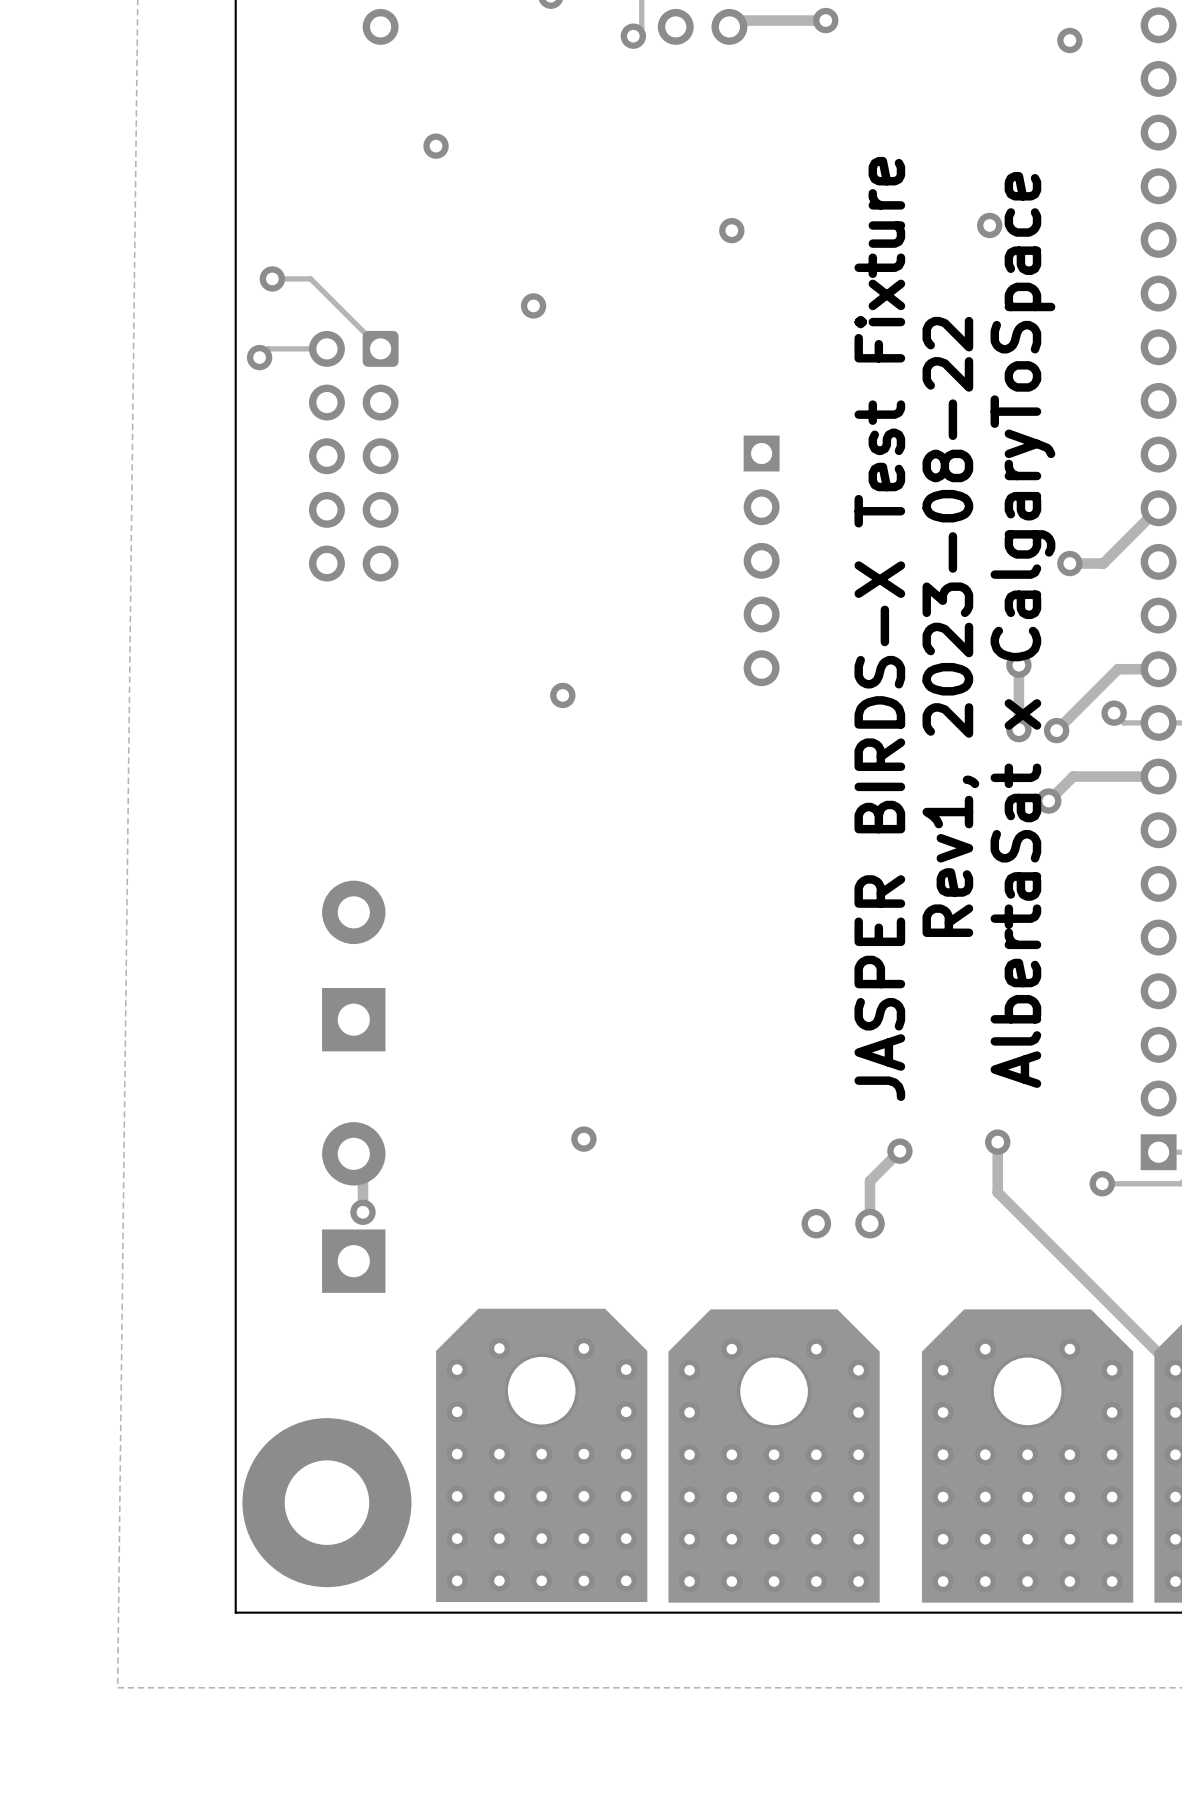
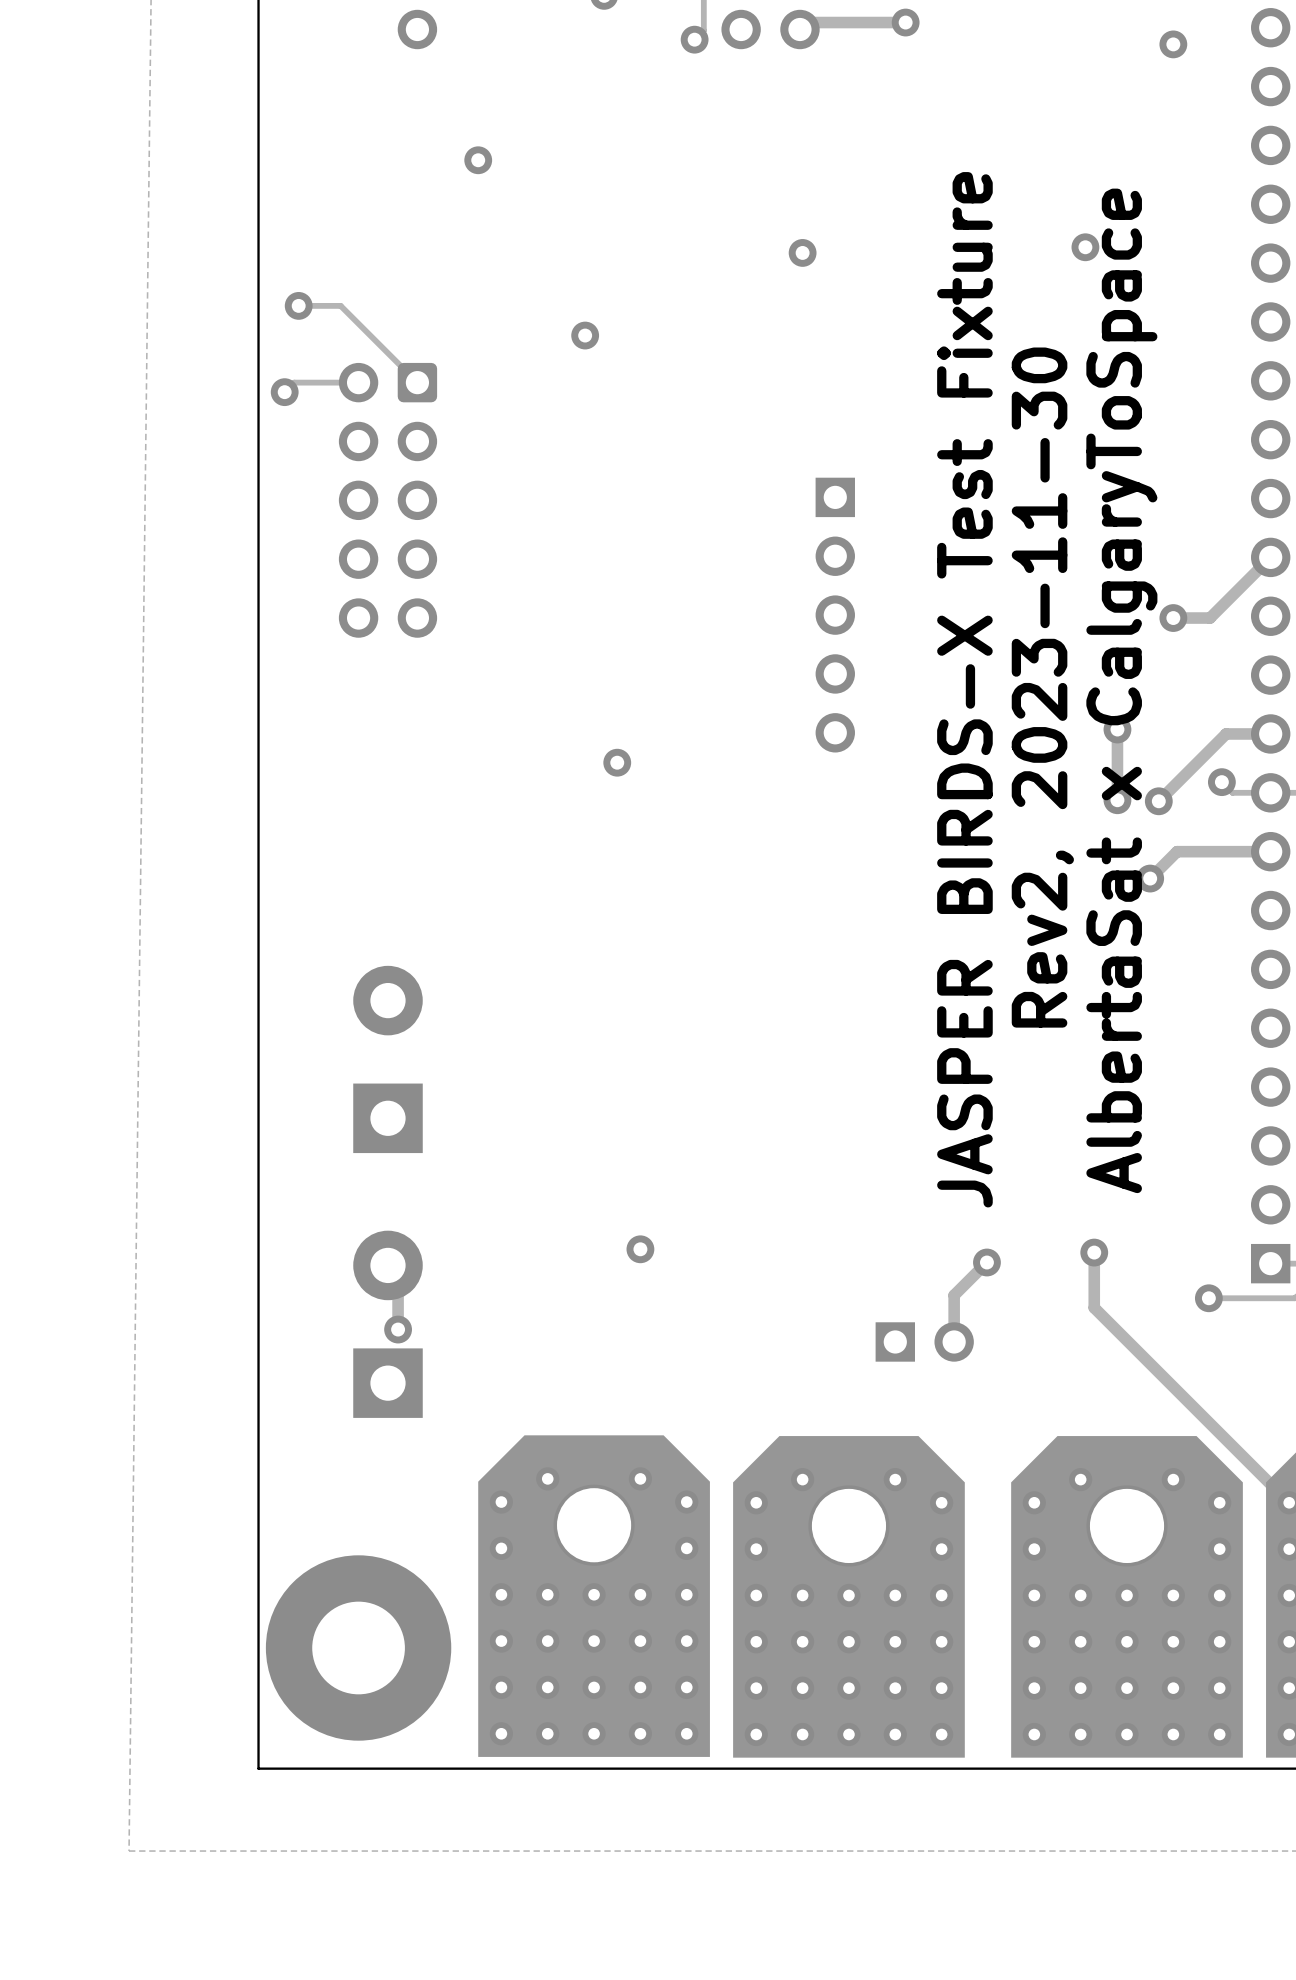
text: Rev1, 2023-08-22 (950, 626) -> Rev2, 2023-11-30 (1042, 687)
part footprint: [801, 1208, 885, 1239] -> [875, 1322, 974, 1362]

